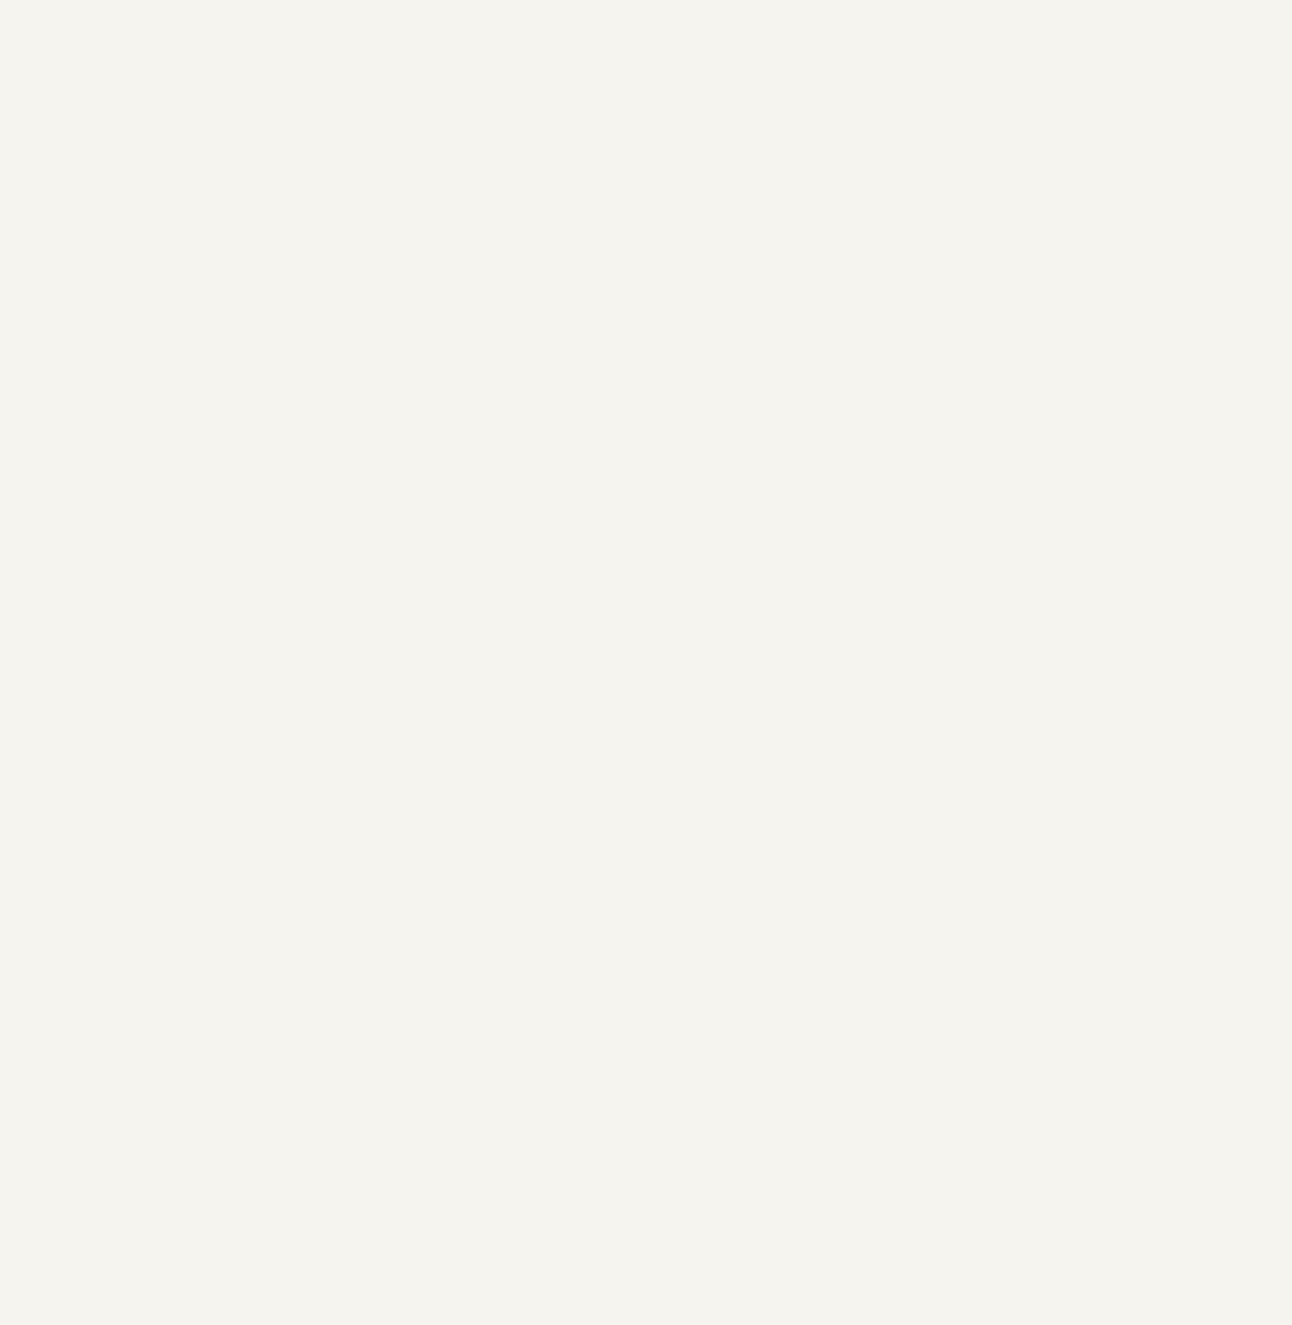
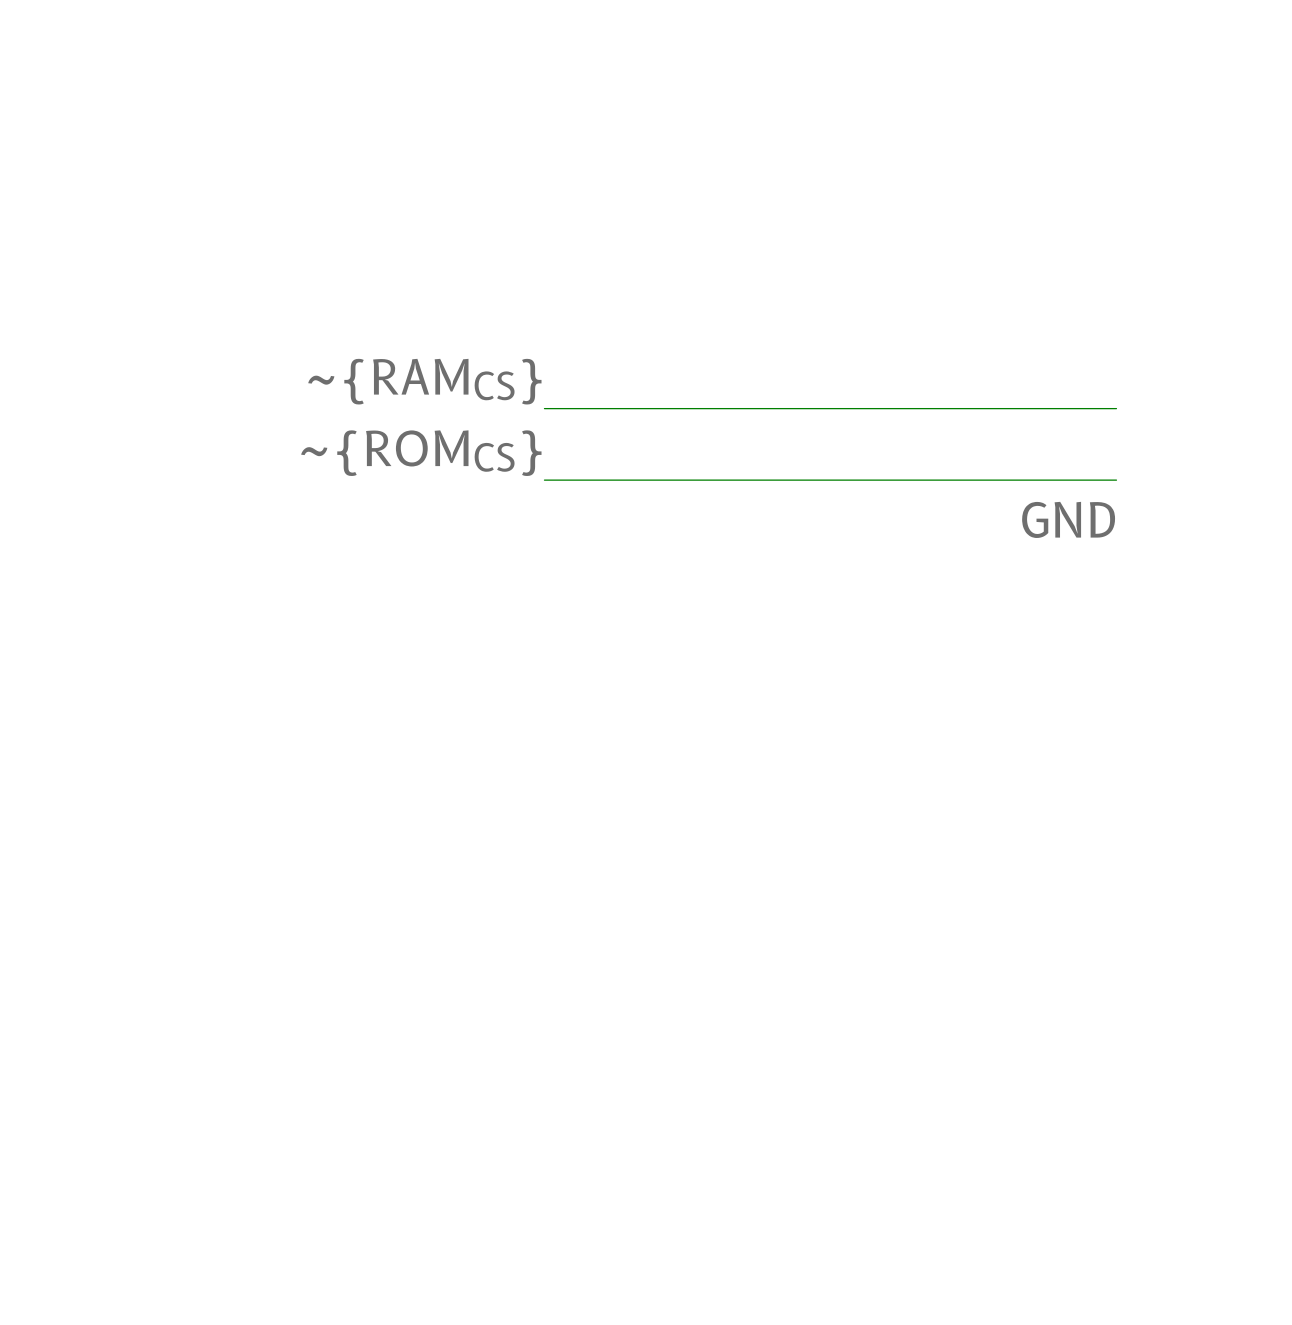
label: none -> ~{RAMCS} (424, 381)
wire: none -> (544, 408) (1116, 408)
label: none -> ~{ROMCS} (421, 453)
wire: none -> (544, 480) (1116, 480)
label: none -> GND (1068, 519)

